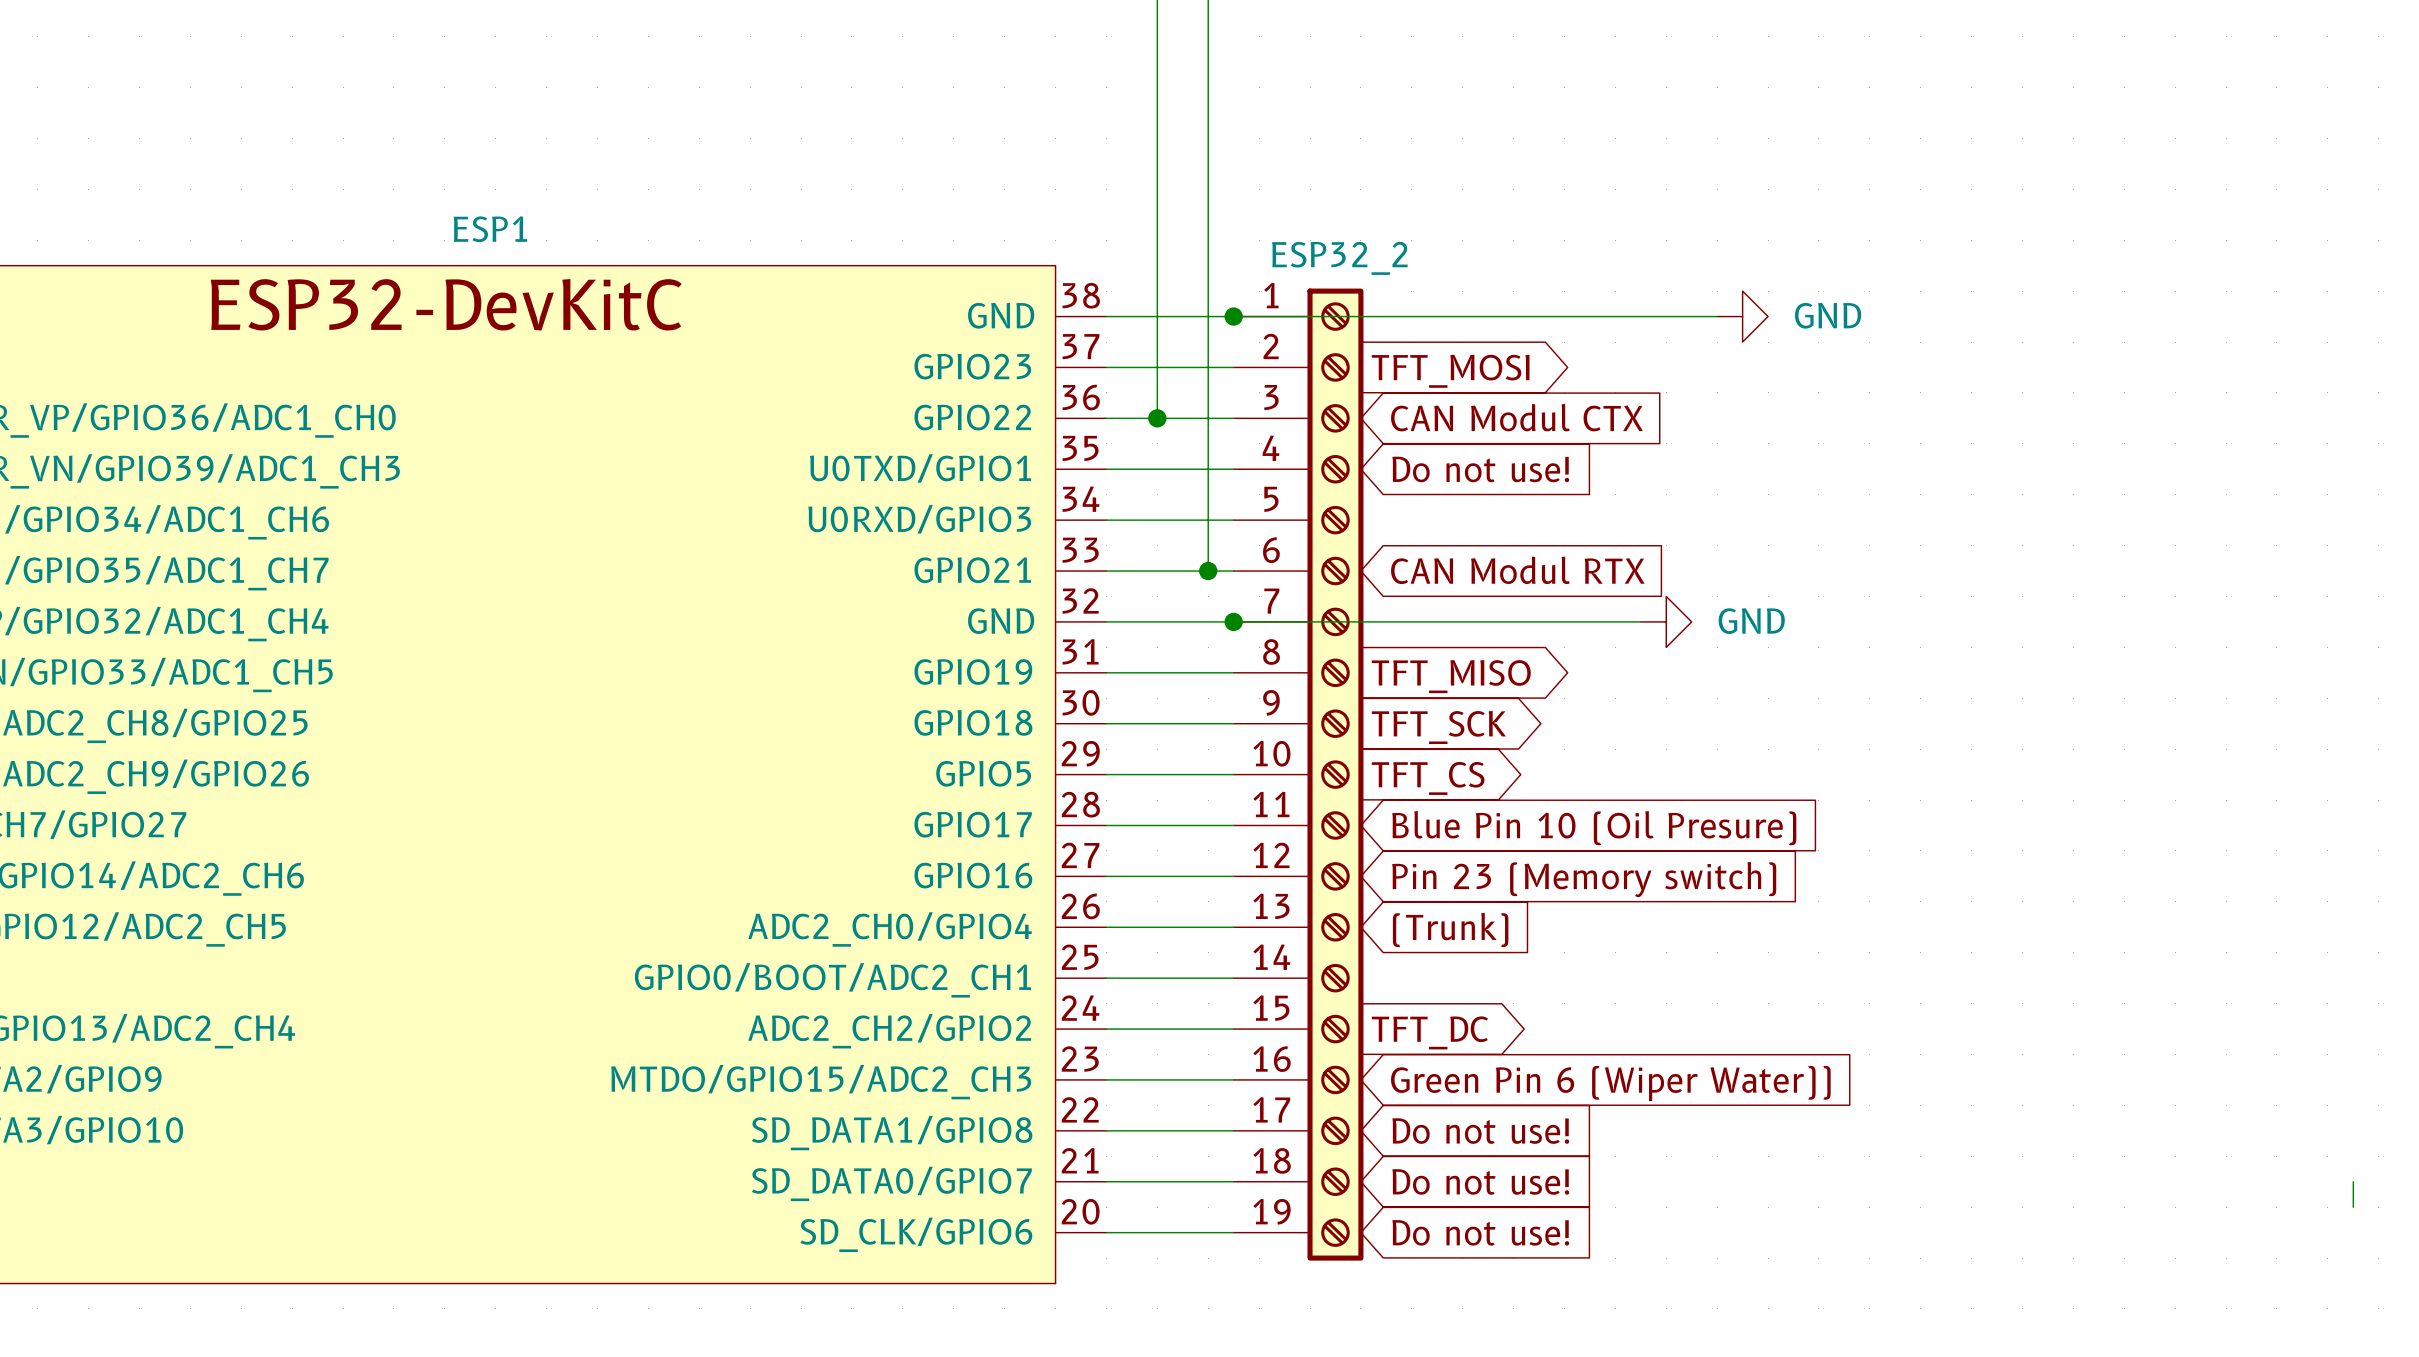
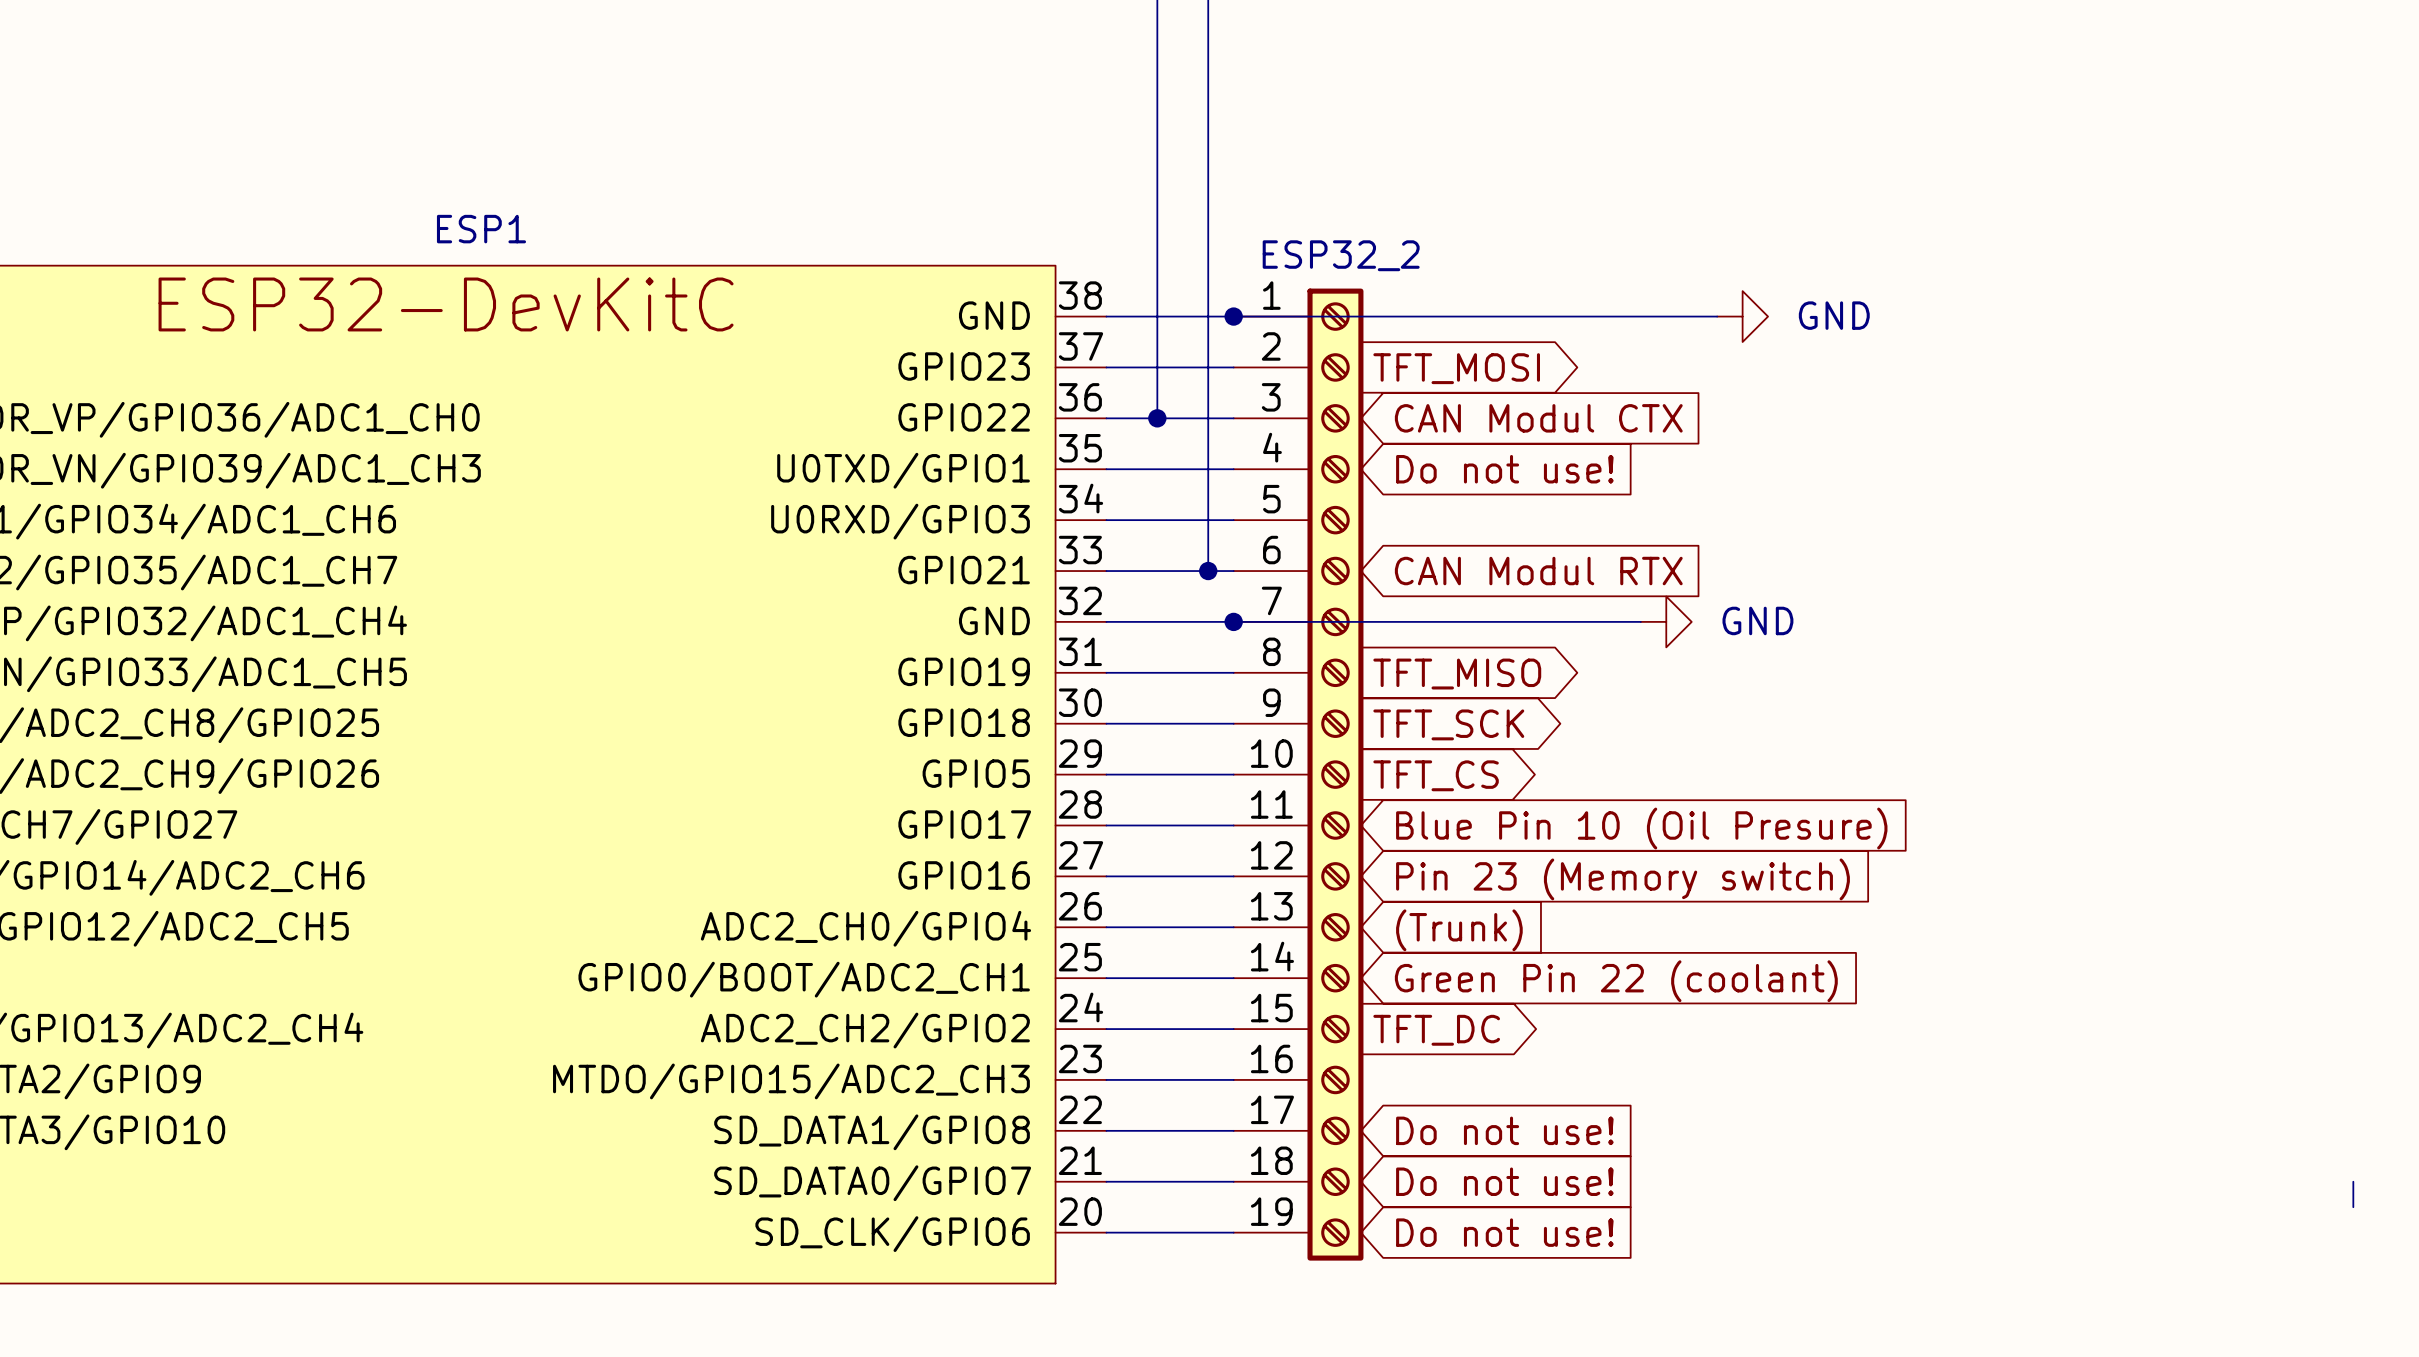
global label: none -> Green Pin 22 (coolant) (1616, 981)
global label: Green Pin 6 (Wiper Water)) (1610, 1083) -> none

